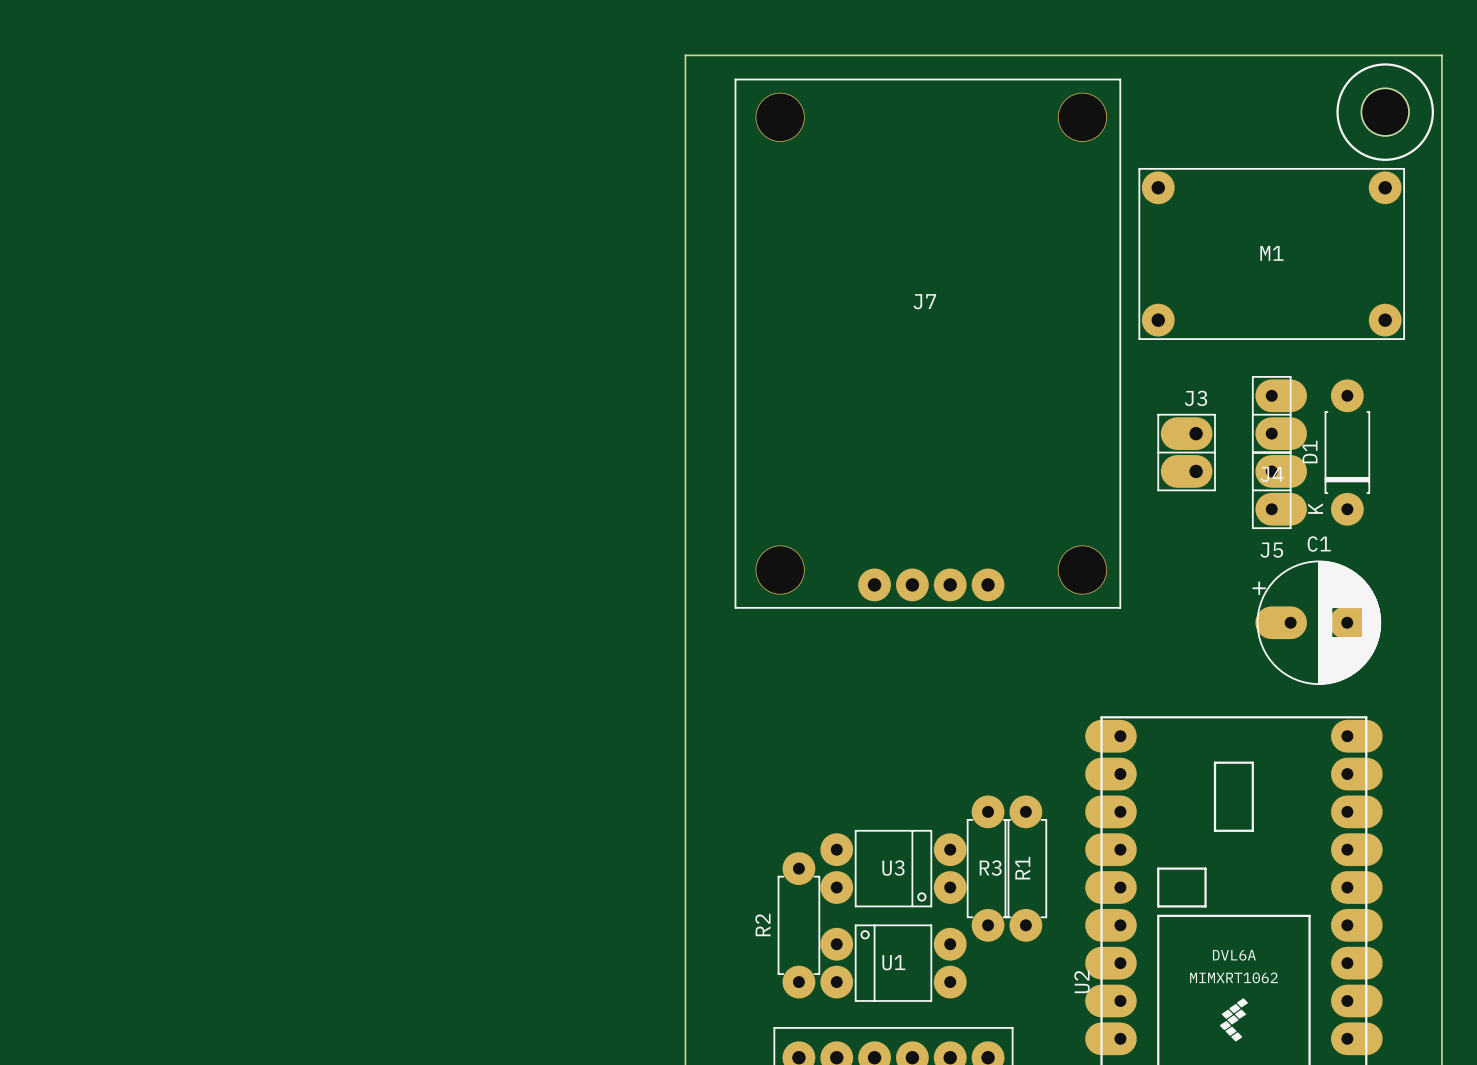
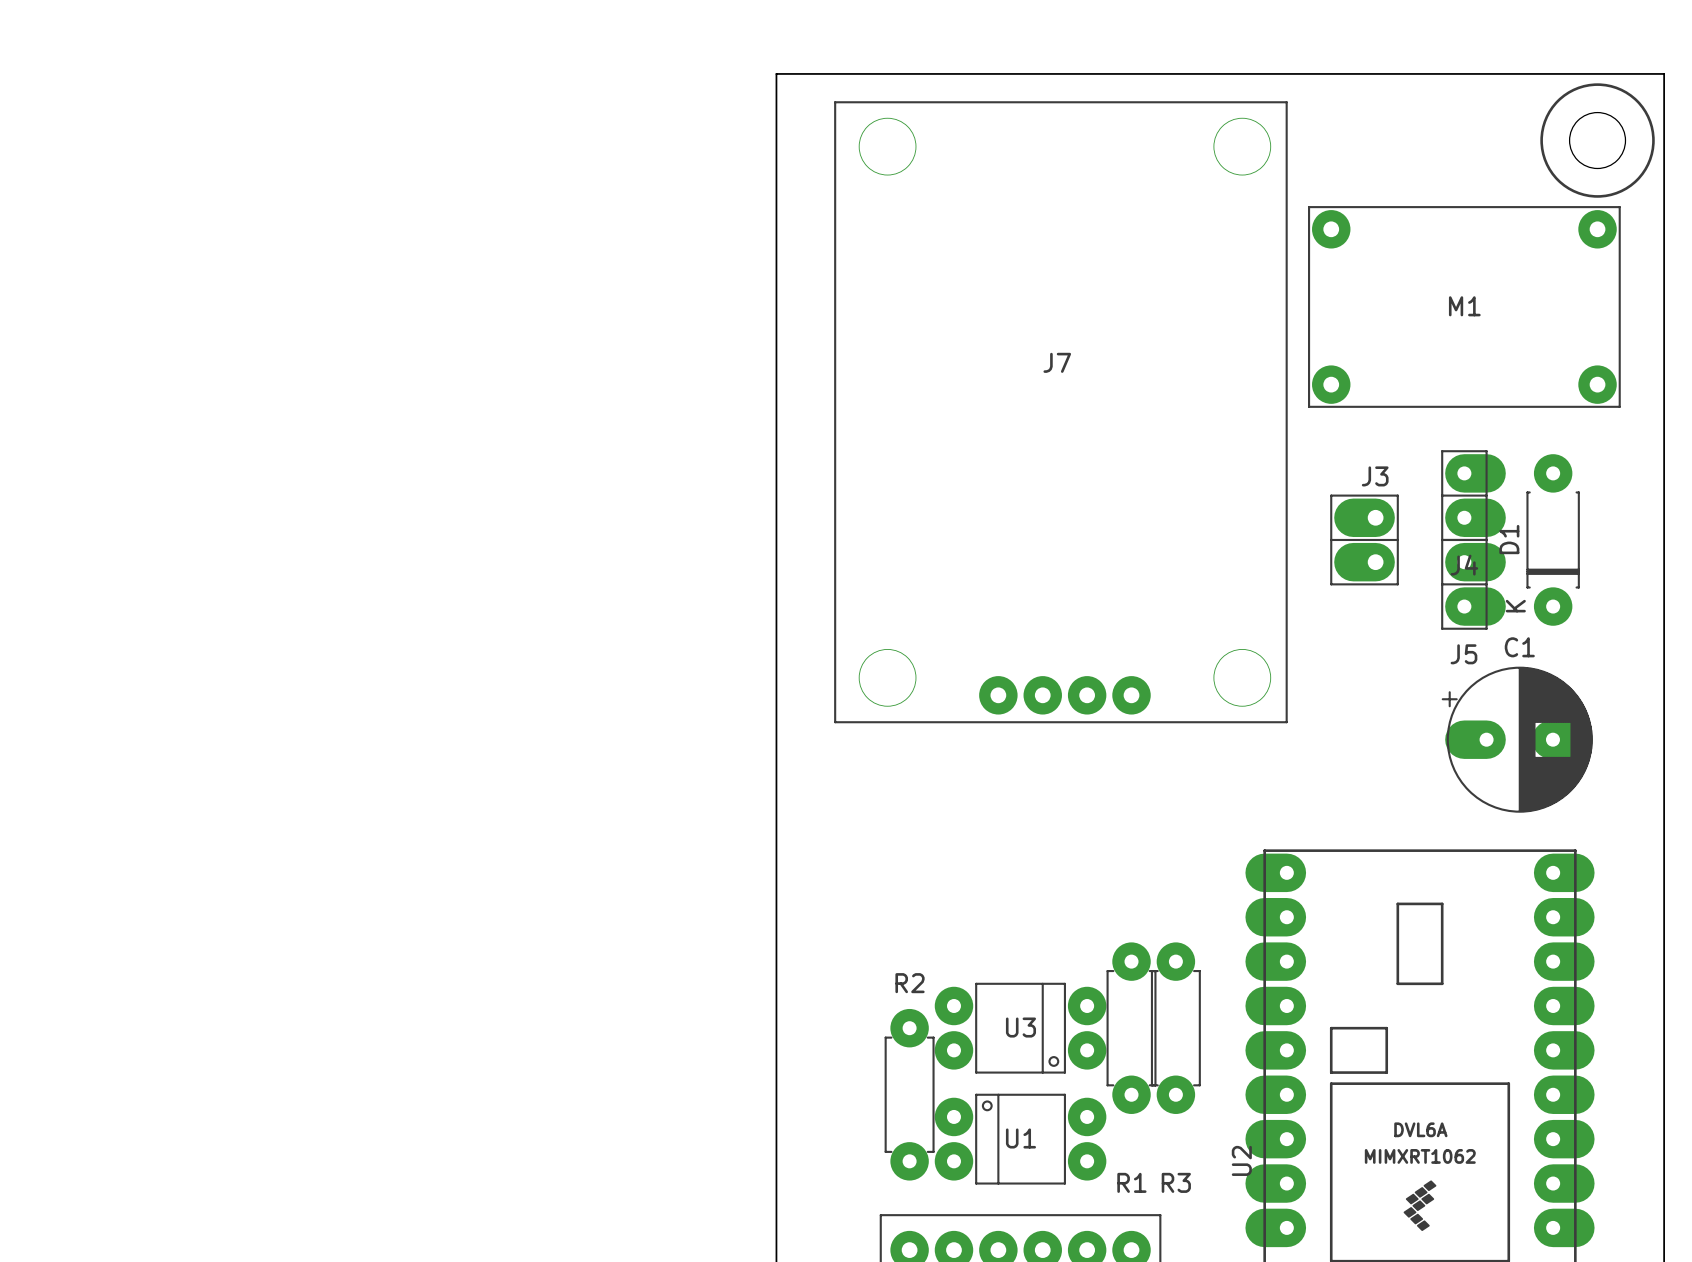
R3 name position: R3 (990, 868) -> R3 (1176, 1182)
R1 name rotation: 0° (1022, 868) -> 90° clockwise (1131, 1182)
R1 name position: R1 (1022, 868) -> R1 (1131, 1182)
R2 name rotation: 0° (762, 925) -> 90° clockwise (910, 983)
R2 name position: R2 (762, 925) -> R2 (910, 983)

